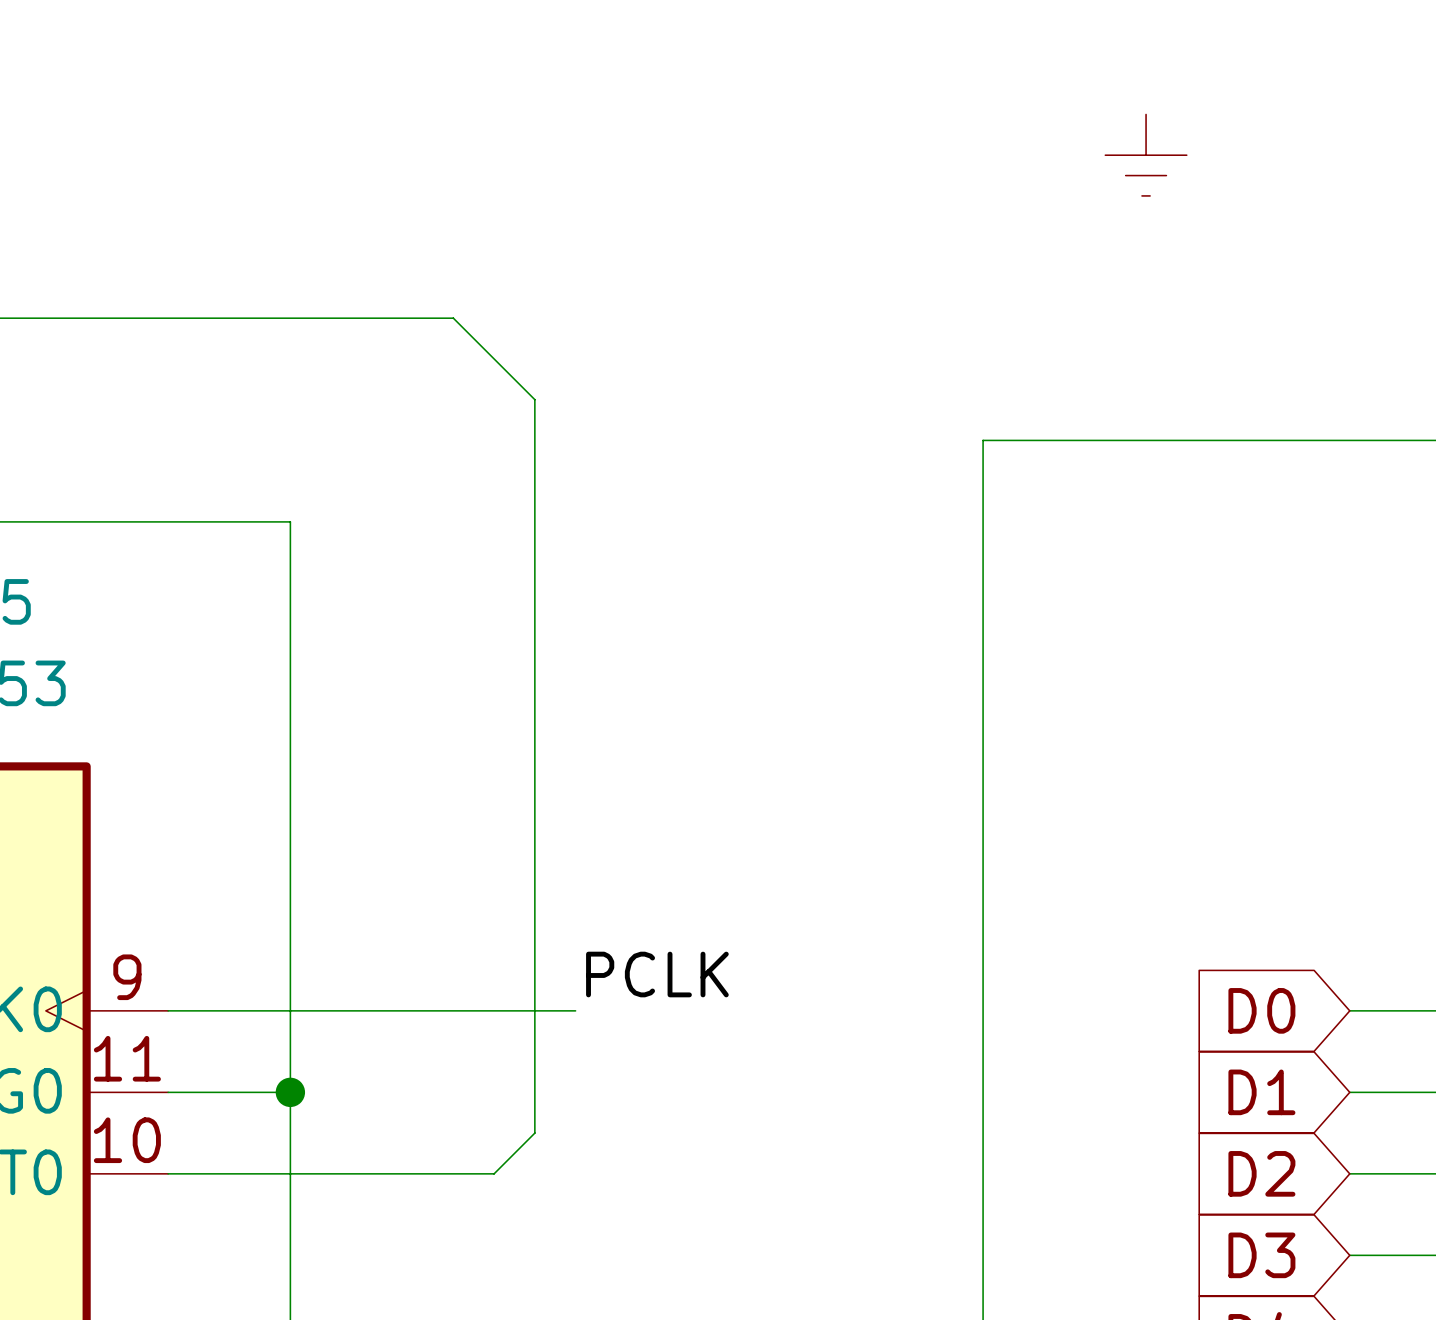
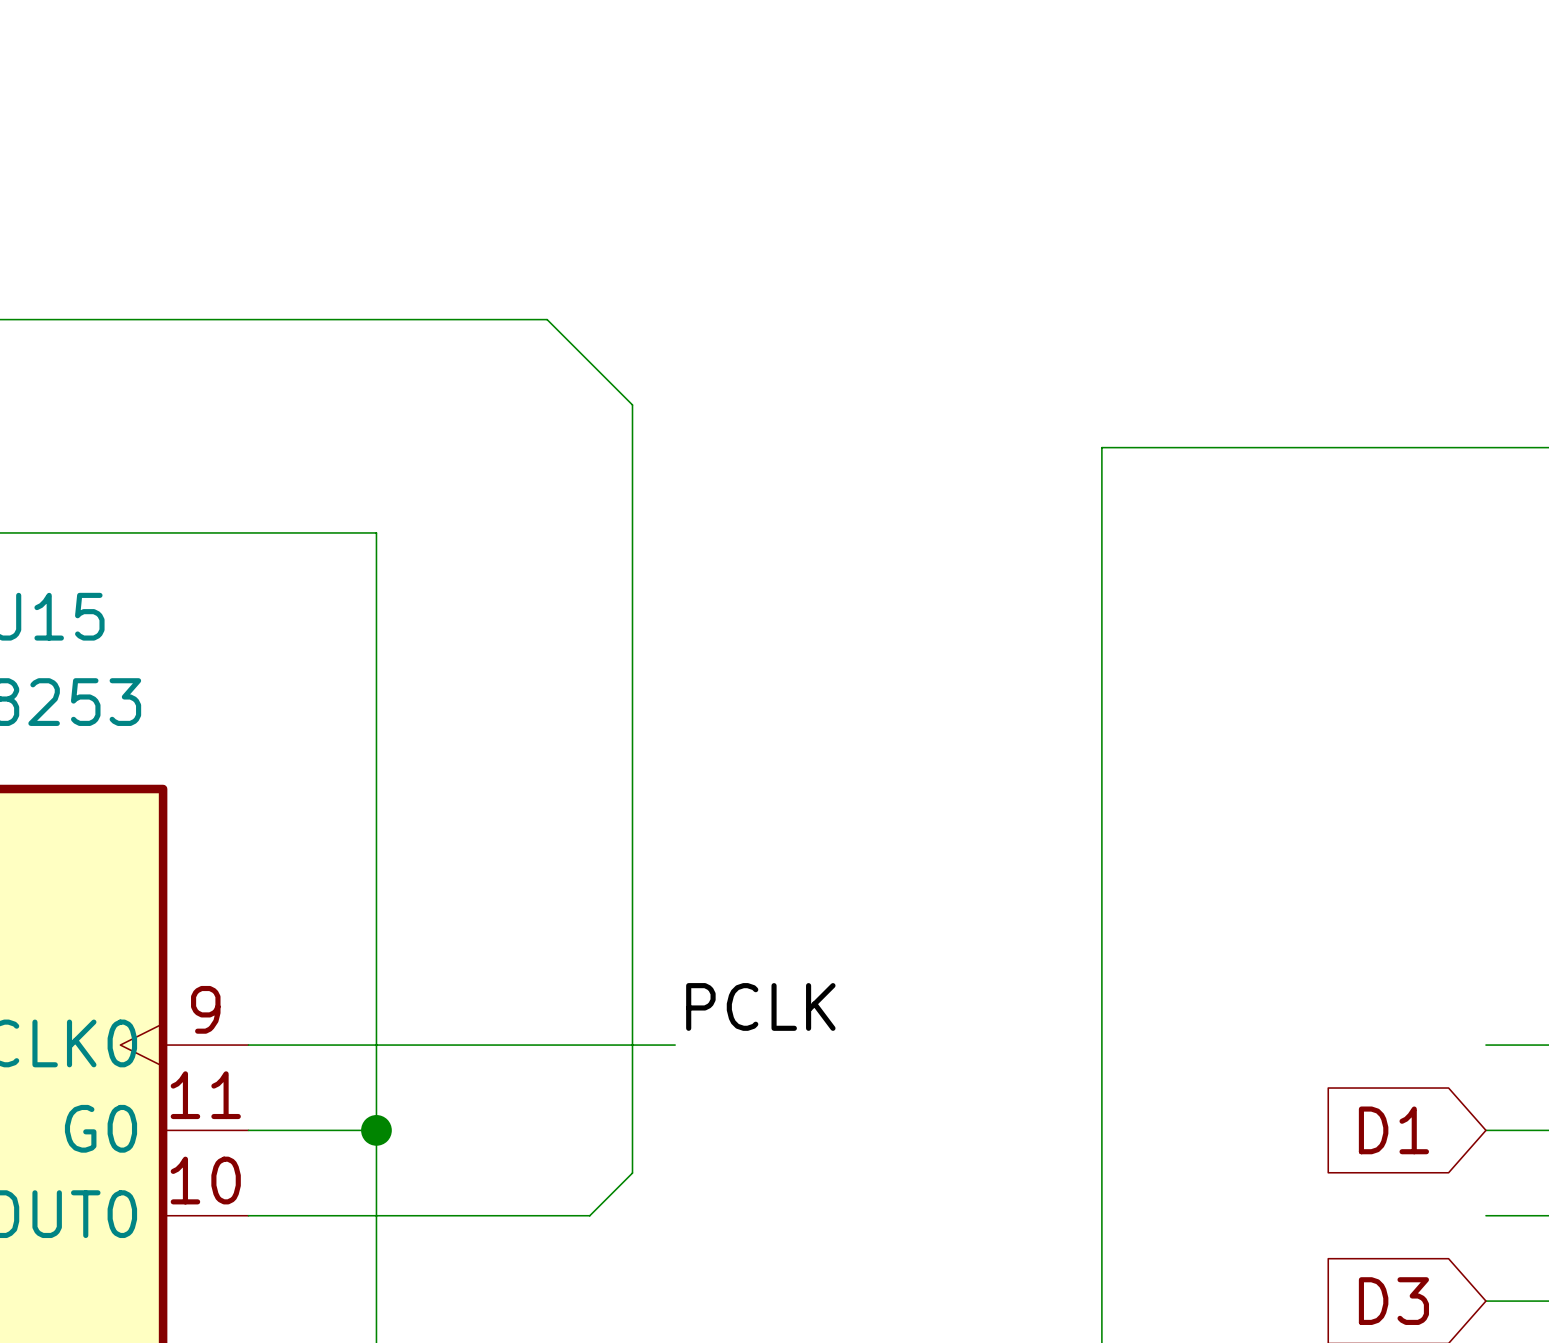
power symbol: (1146, 155) -> none
global label: D0 (1261, 1010) -> none
global label: D2 (1261, 1173) -> none

